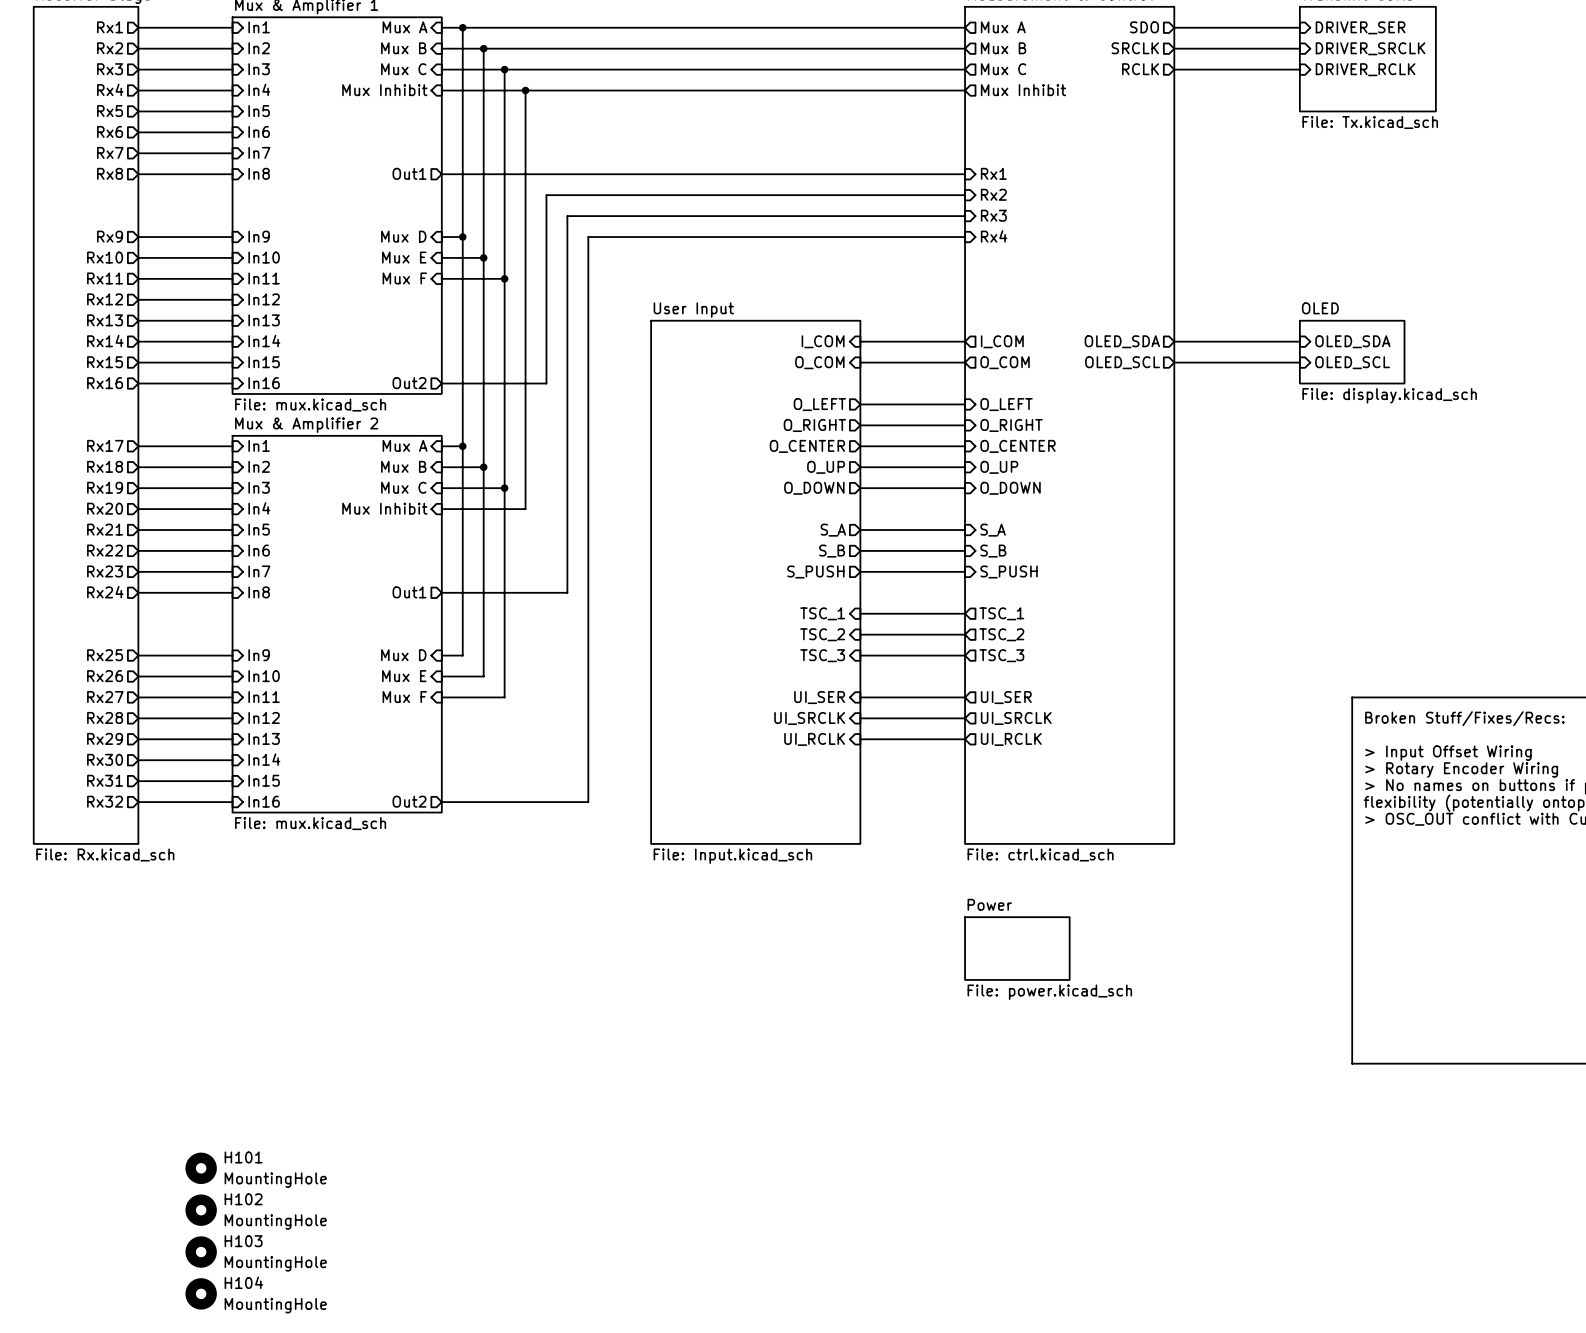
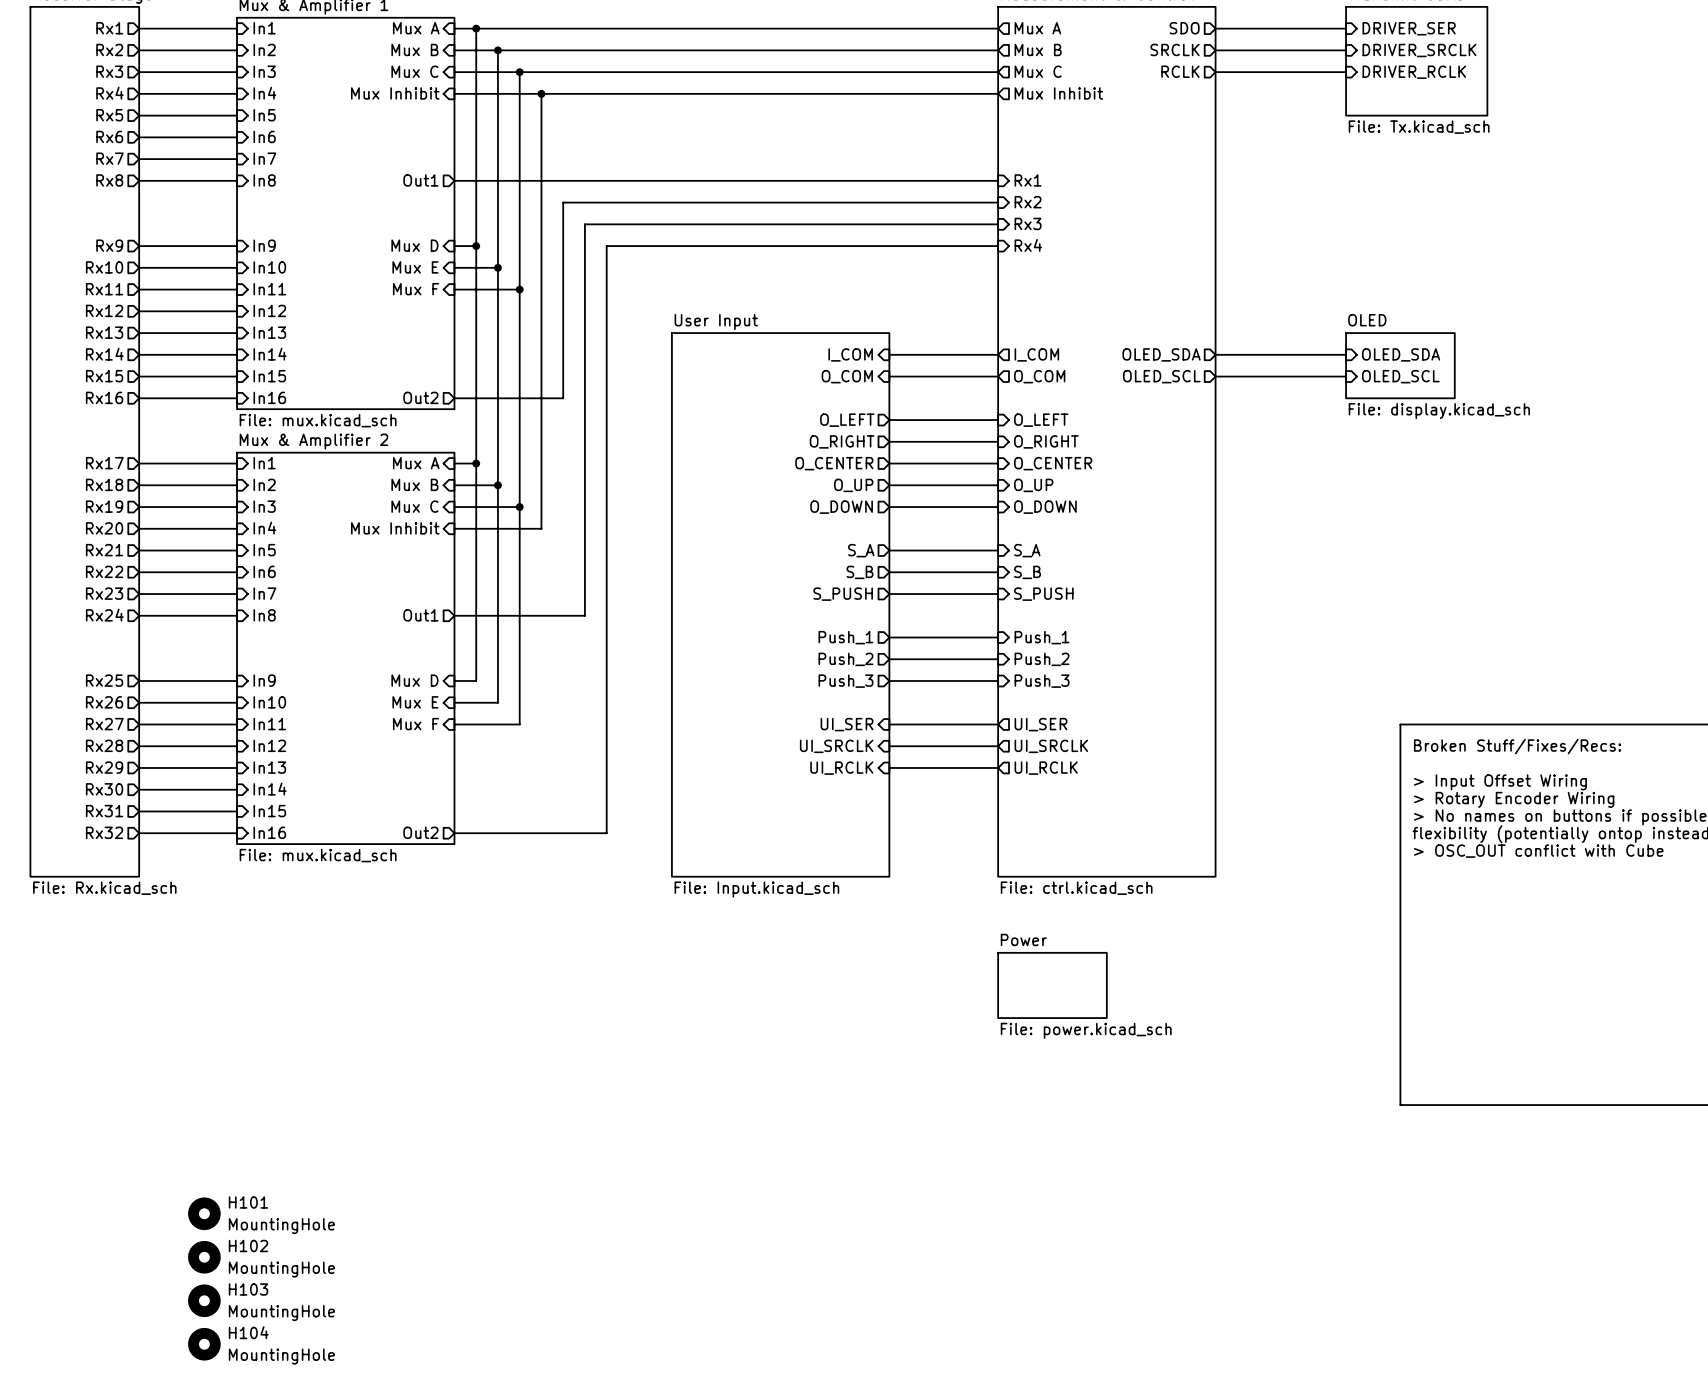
sheet pin shape: input (822, 613) -> output (845, 637)
sheet pin: TSC_1 (822, 613) -> Push_1 (845, 637)
sheet pin shape: output (1001, 613) -> input (1042, 637)
sheet pin: TSC_1 (1001, 613) -> Push_1 (1042, 637)
sheet pin shape: input (822, 634) -> output (845, 659)
sheet pin: TSC_2 (822, 634) -> Push_2 (845, 659)
sheet pin shape: output (1001, 634) -> input (1042, 659)
sheet pin: TSC_2 (1001, 634) -> Push_2 (1042, 659)
sheet pin shape: input (822, 655) -> output (845, 681)
sheet pin: TSC_3 (822, 655) -> Push_3 (845, 681)
sheet pin shape: output (1001, 655) -> input (1042, 681)
sheet pin: TSC_3 (1001, 655) -> Push_3 (1042, 681)

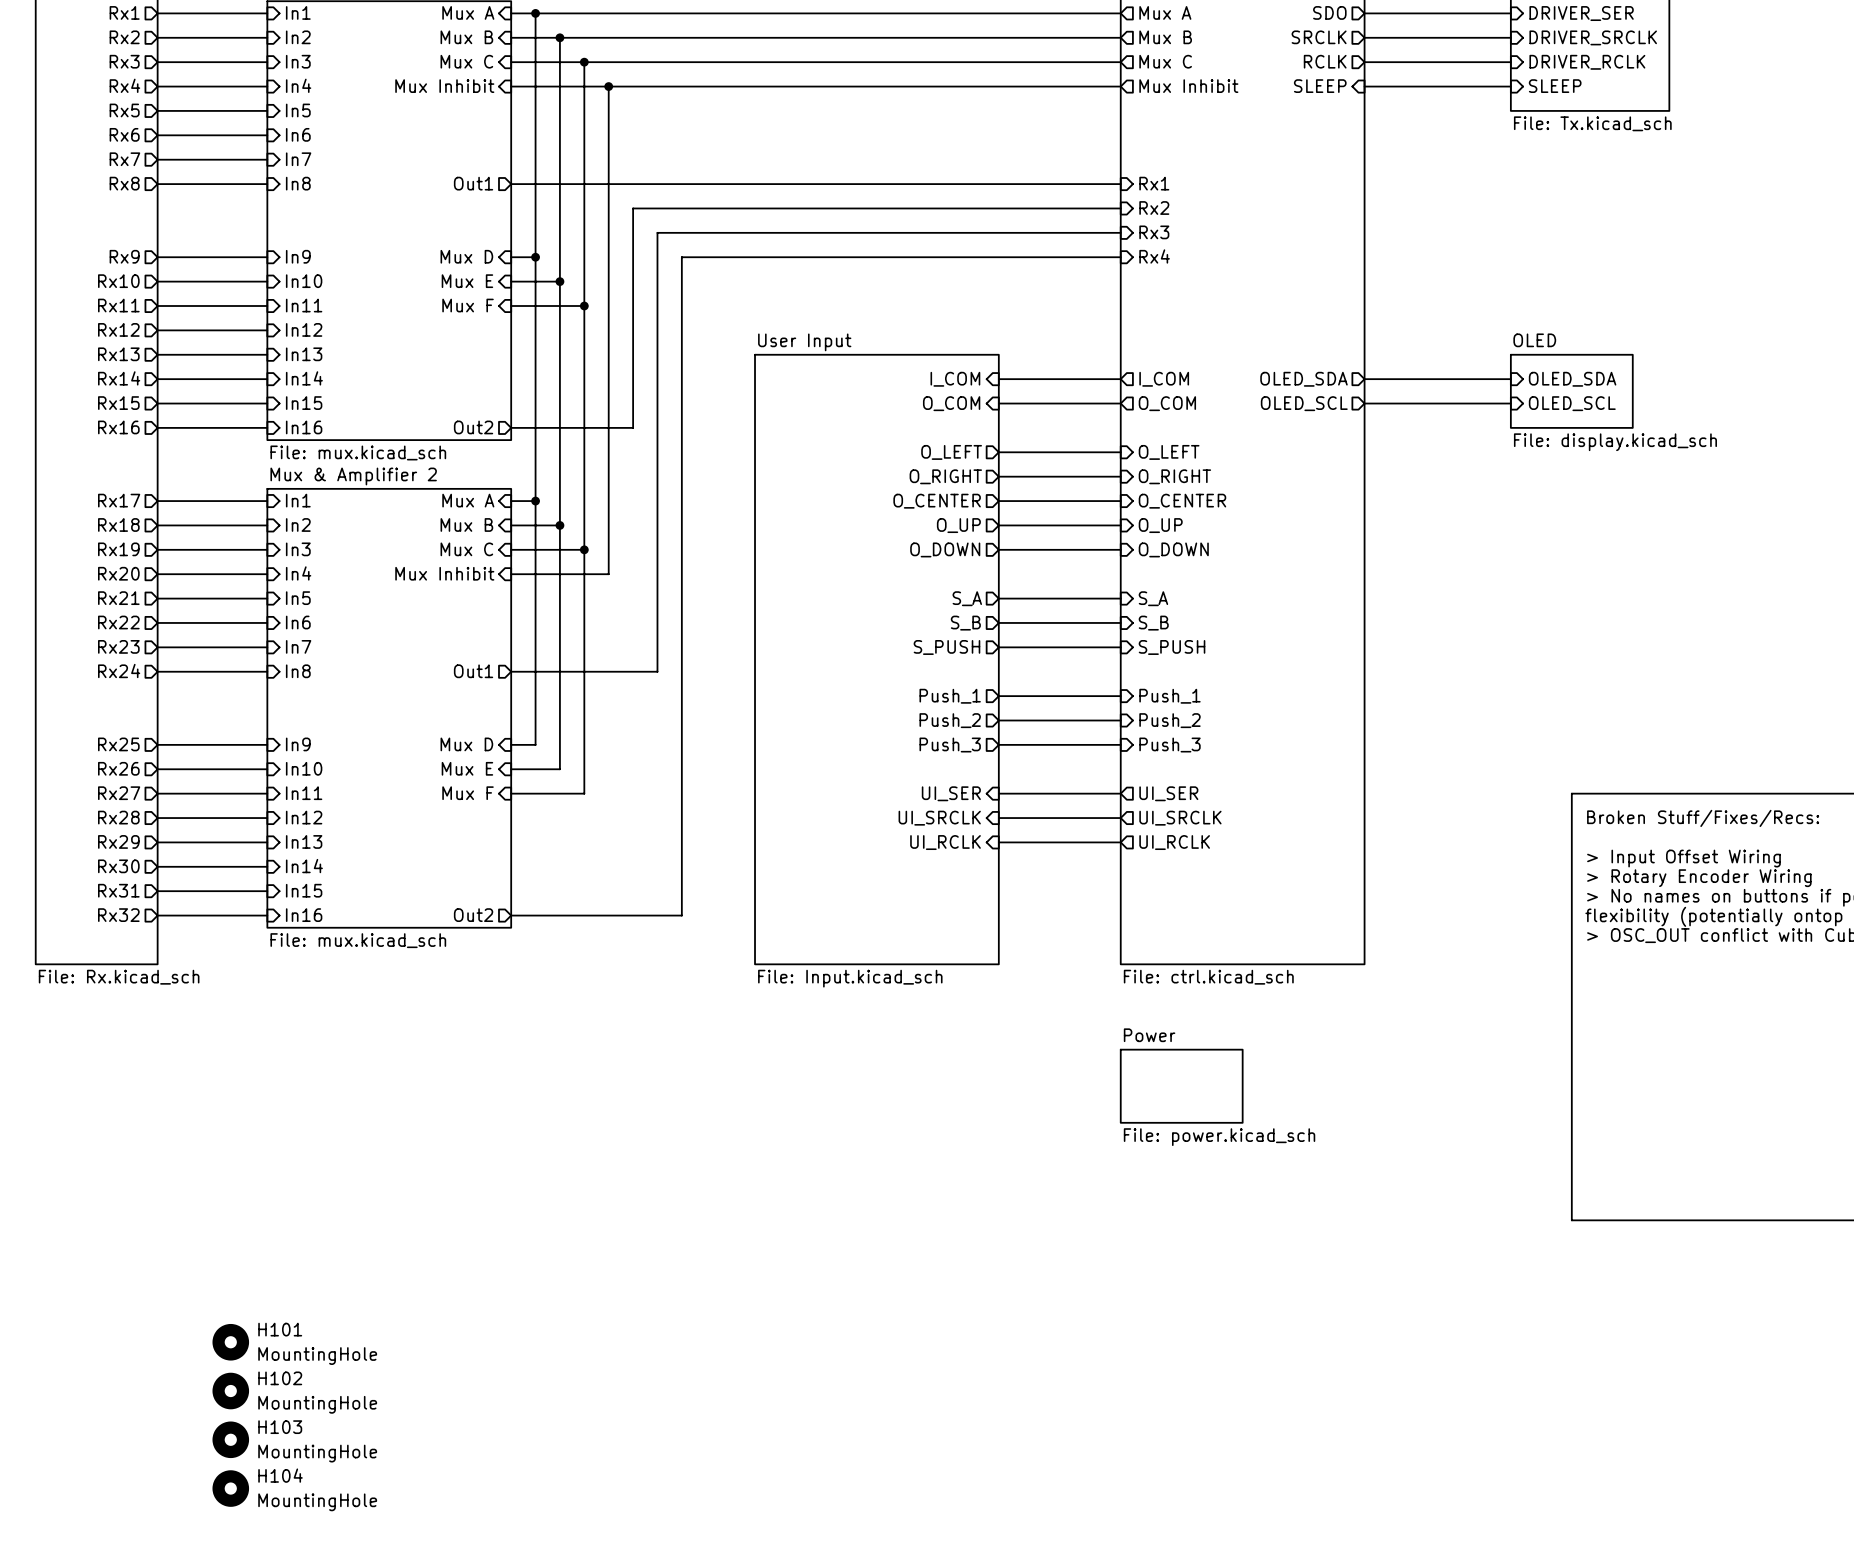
sheet pin: none -> SLEEP (1320, 86)
wire: none -> (1364, 86) (1510, 86)
sheet pin: none -> SLEEP (1555, 86)

